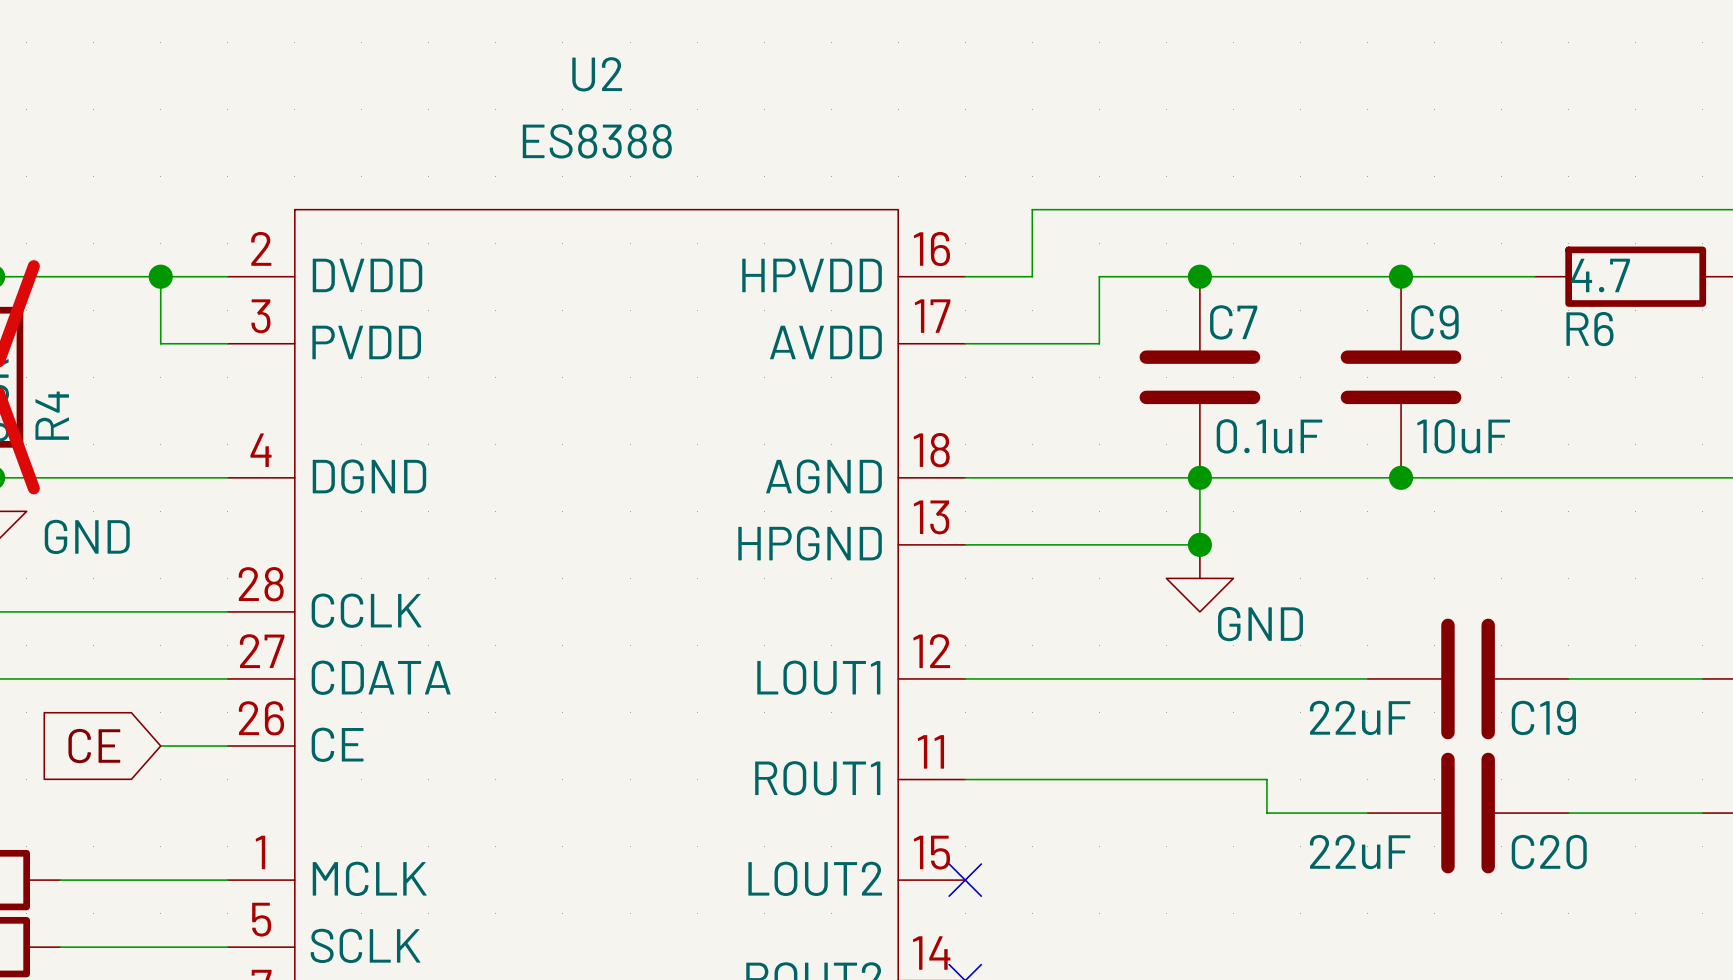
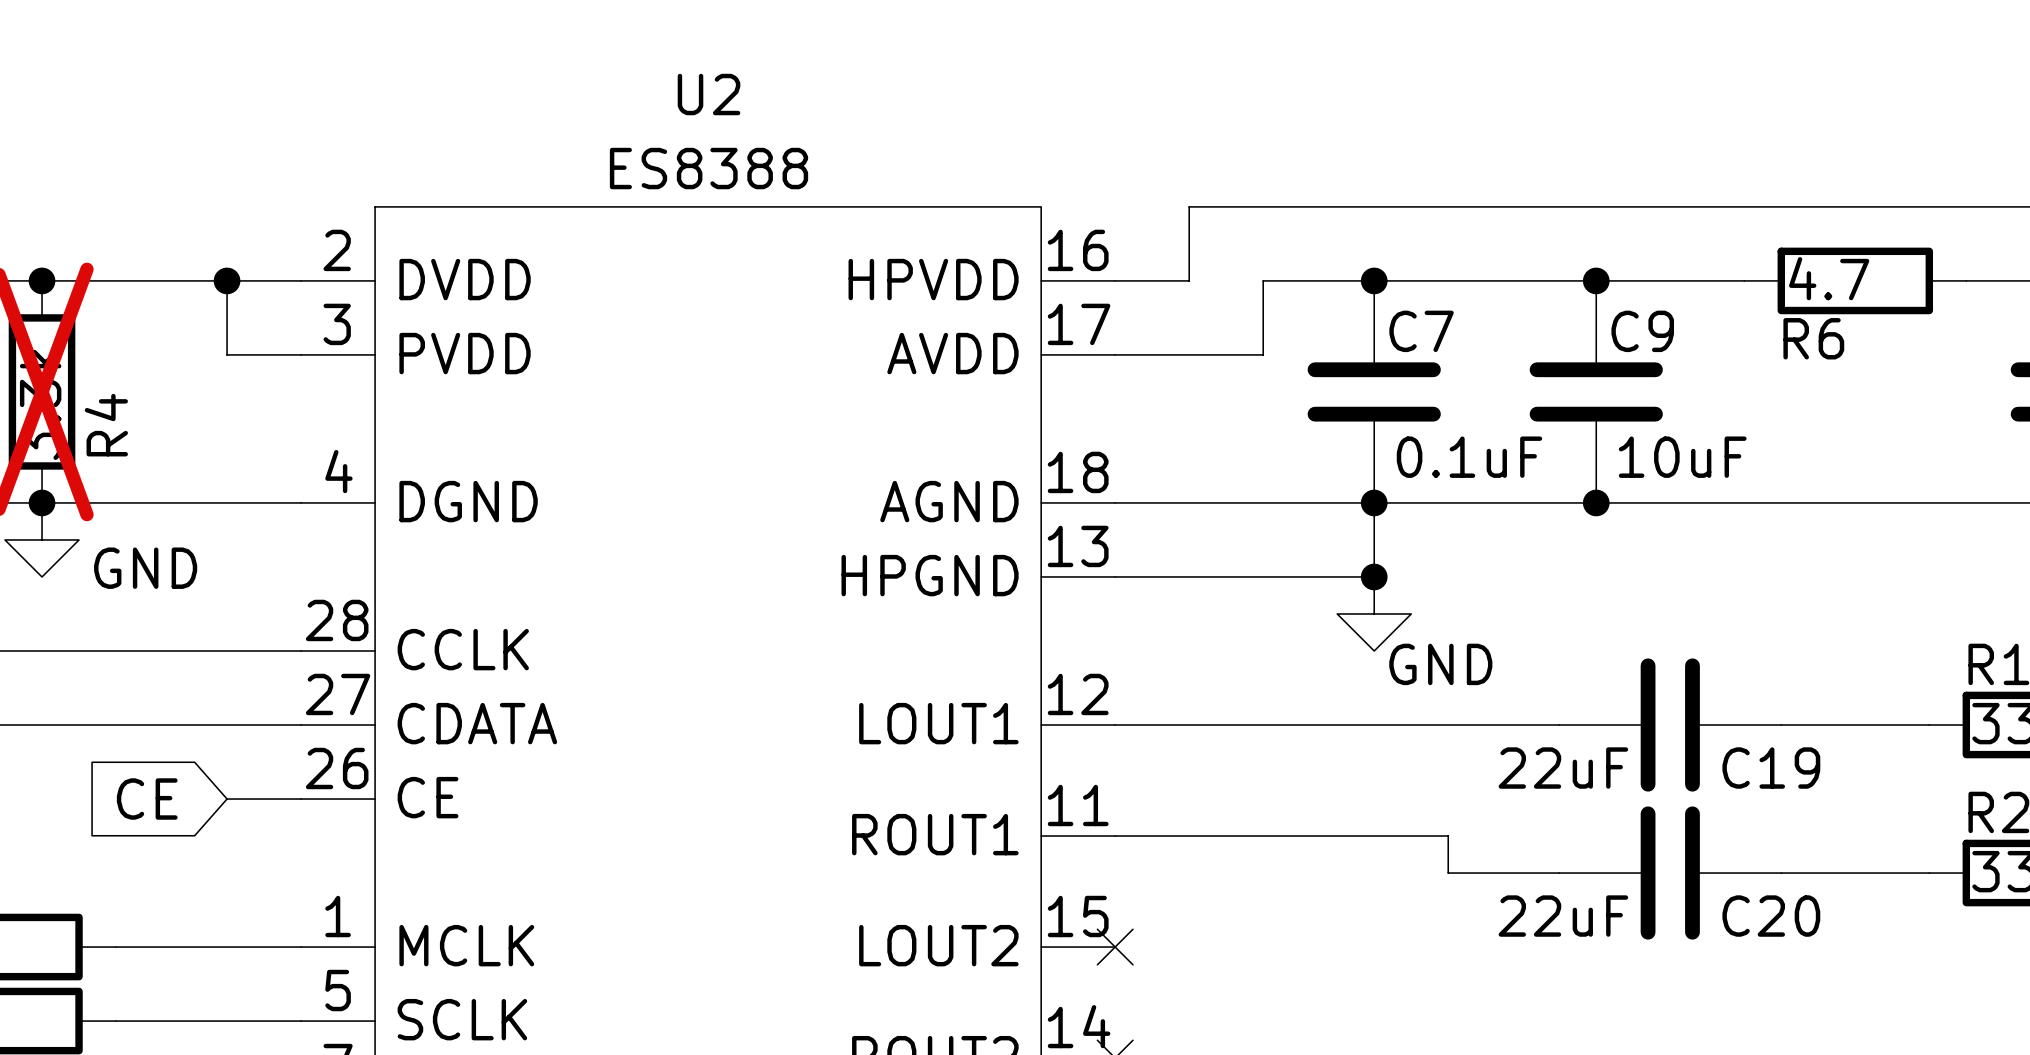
U2 name position: U2 (597, 74) -> U2 (709, 94)
U2 value position: ES8388 (597, 141) -> ES8388 (709, 168)

